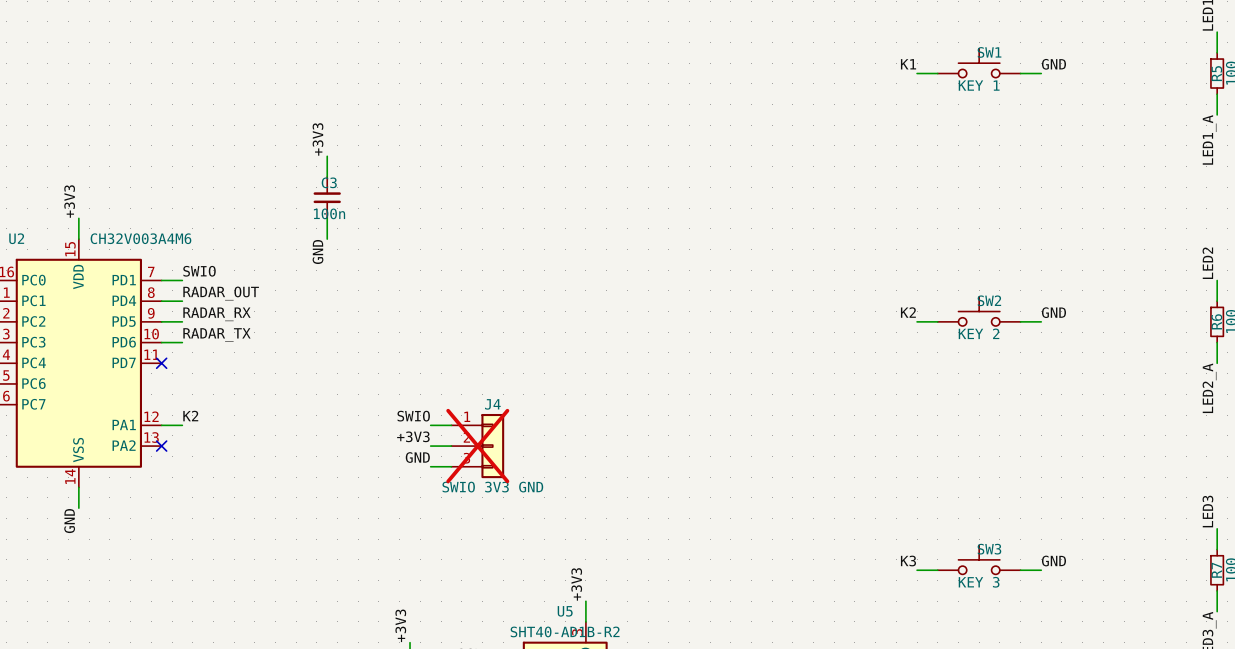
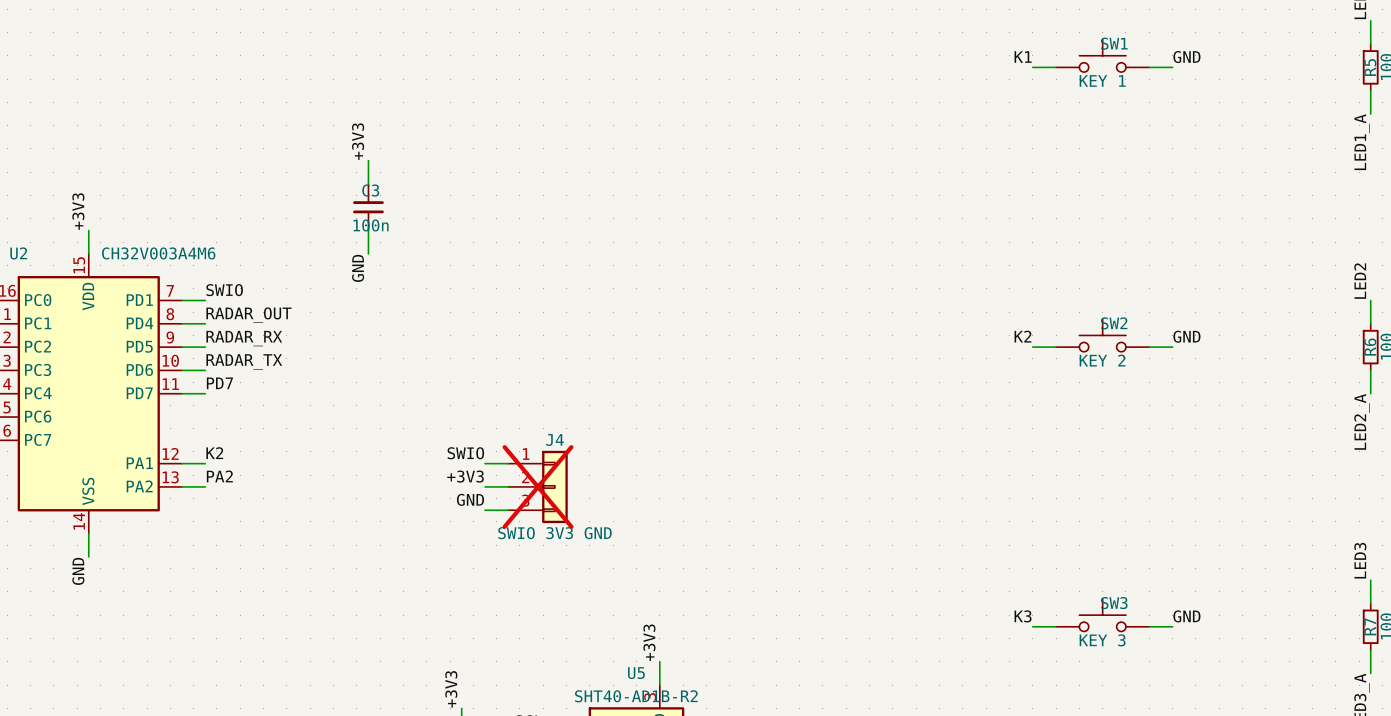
label: none -> PD7 (219, 383)
wire: none -> (182, 393) (205, 393)
no-connect mark: (161, 363) -> none
label: none -> PA2 (219, 476)
wire: none -> (182, 486) (205, 486)
no-connect mark: (161, 446) -> none

